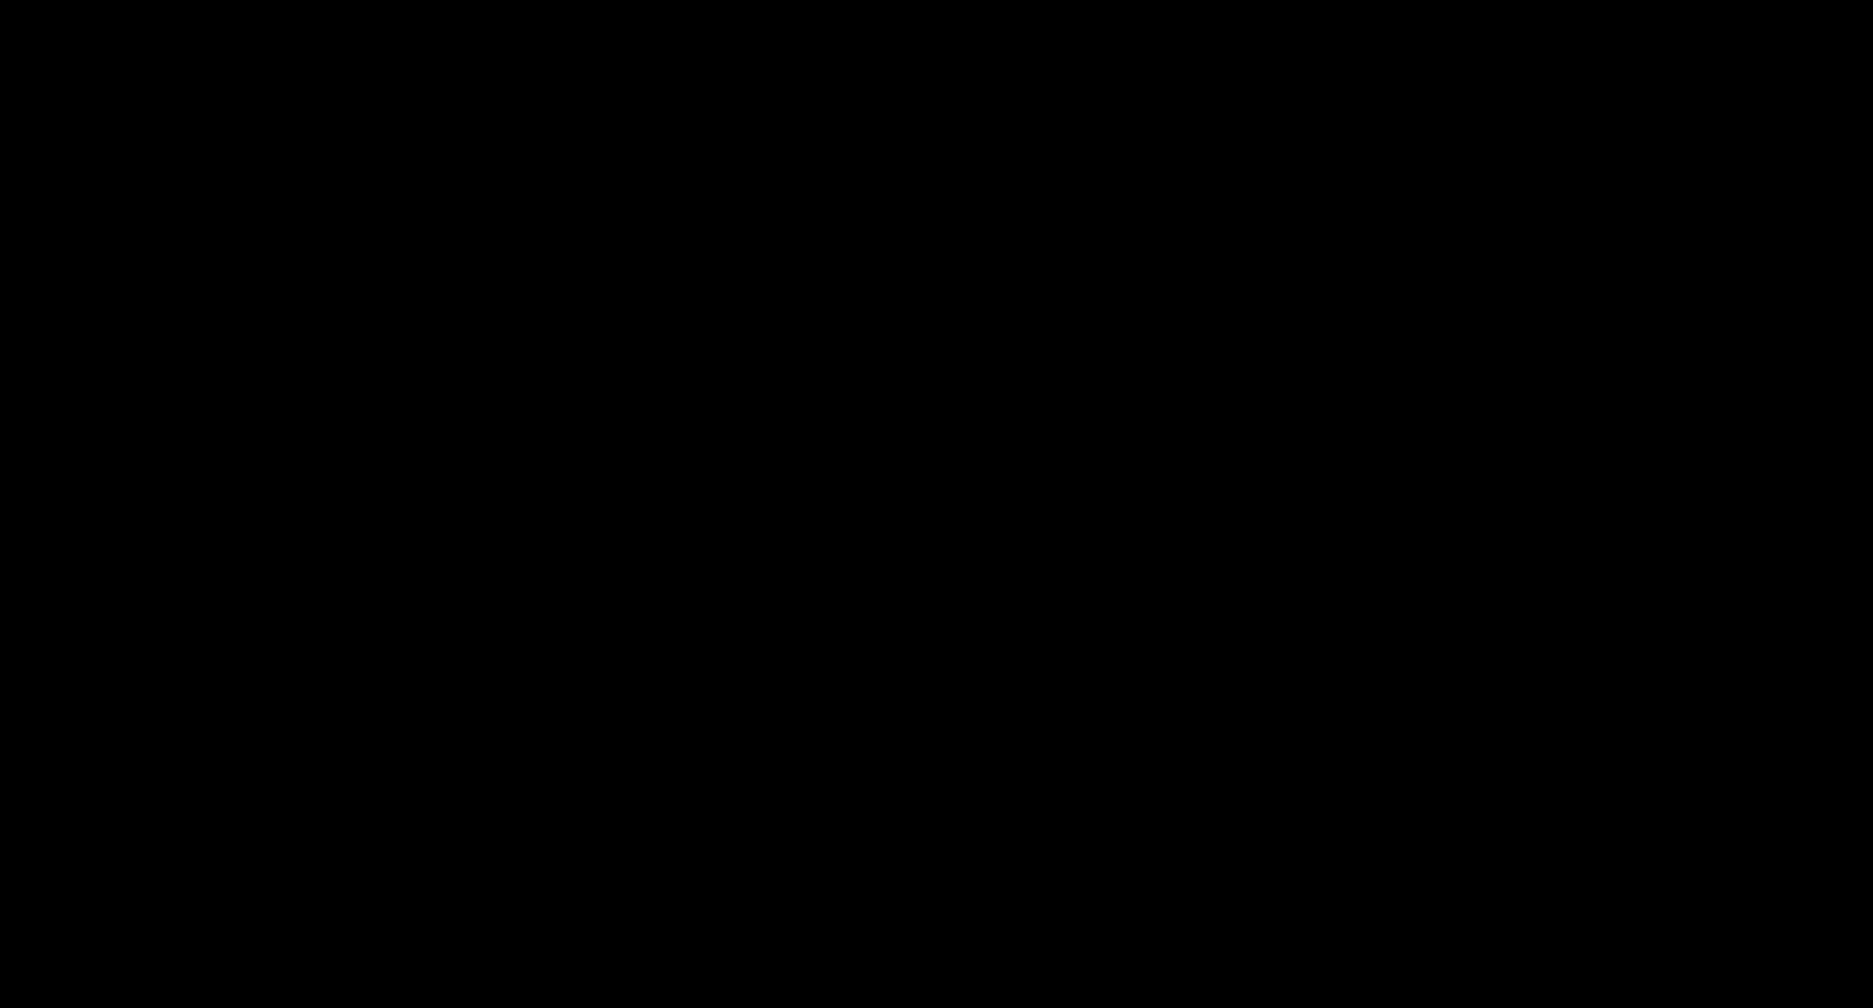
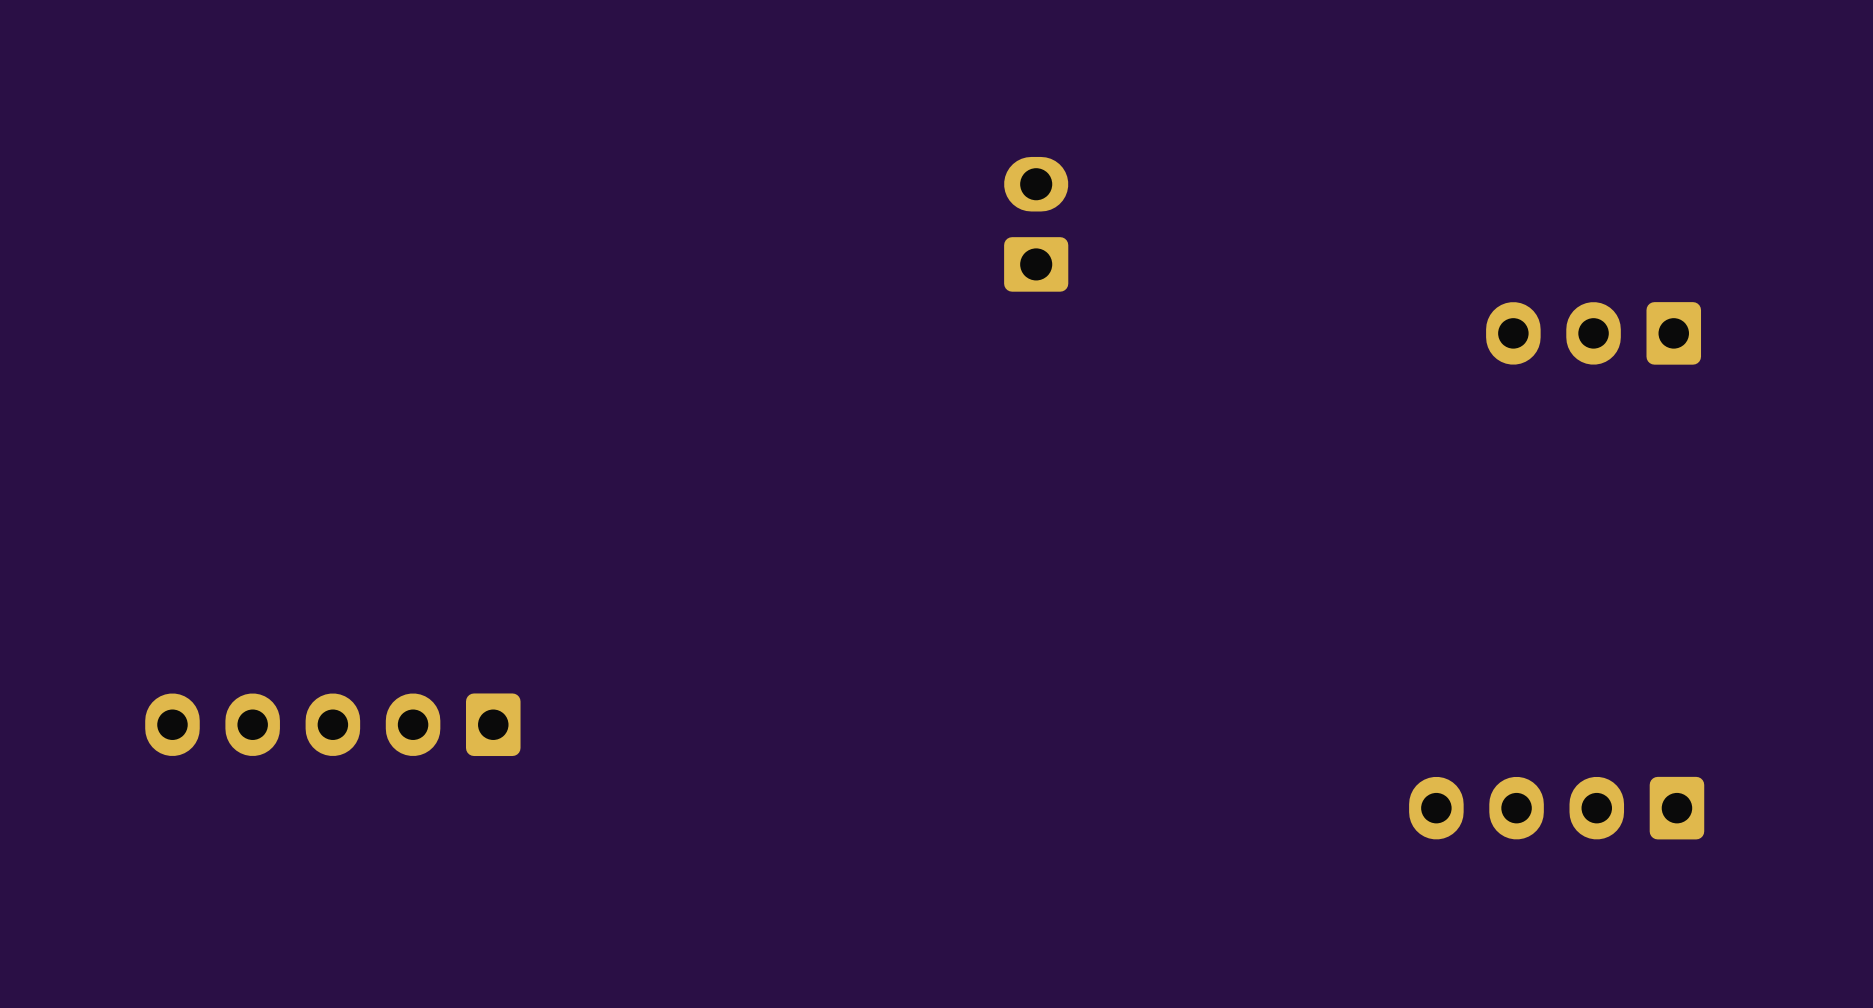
part: none -> (1036, 224)
part: none -> (1593, 333)
part: none -> (332, 724)
part: none -> (1556, 808)

